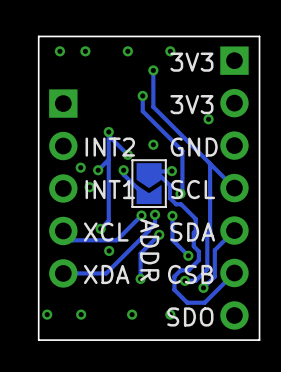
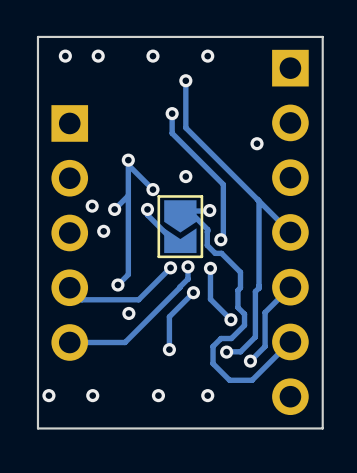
text: 3V3 (191, 62) -> none
text: 3V3 (191, 104) -> none
text: INT2 (110, 147) -> none
text: GND (194, 147) -> none
text: INT1 (110, 189) -> none
text: SCL (193, 189) -> none
text: XCL (106, 232) -> none
text: SDA (192, 232) -> none
text: ADDR (149, 250) -> none
text: XDA (106, 274) -> none
text: CSB (190, 274) -> none
text: SDO (190, 316) -> none

